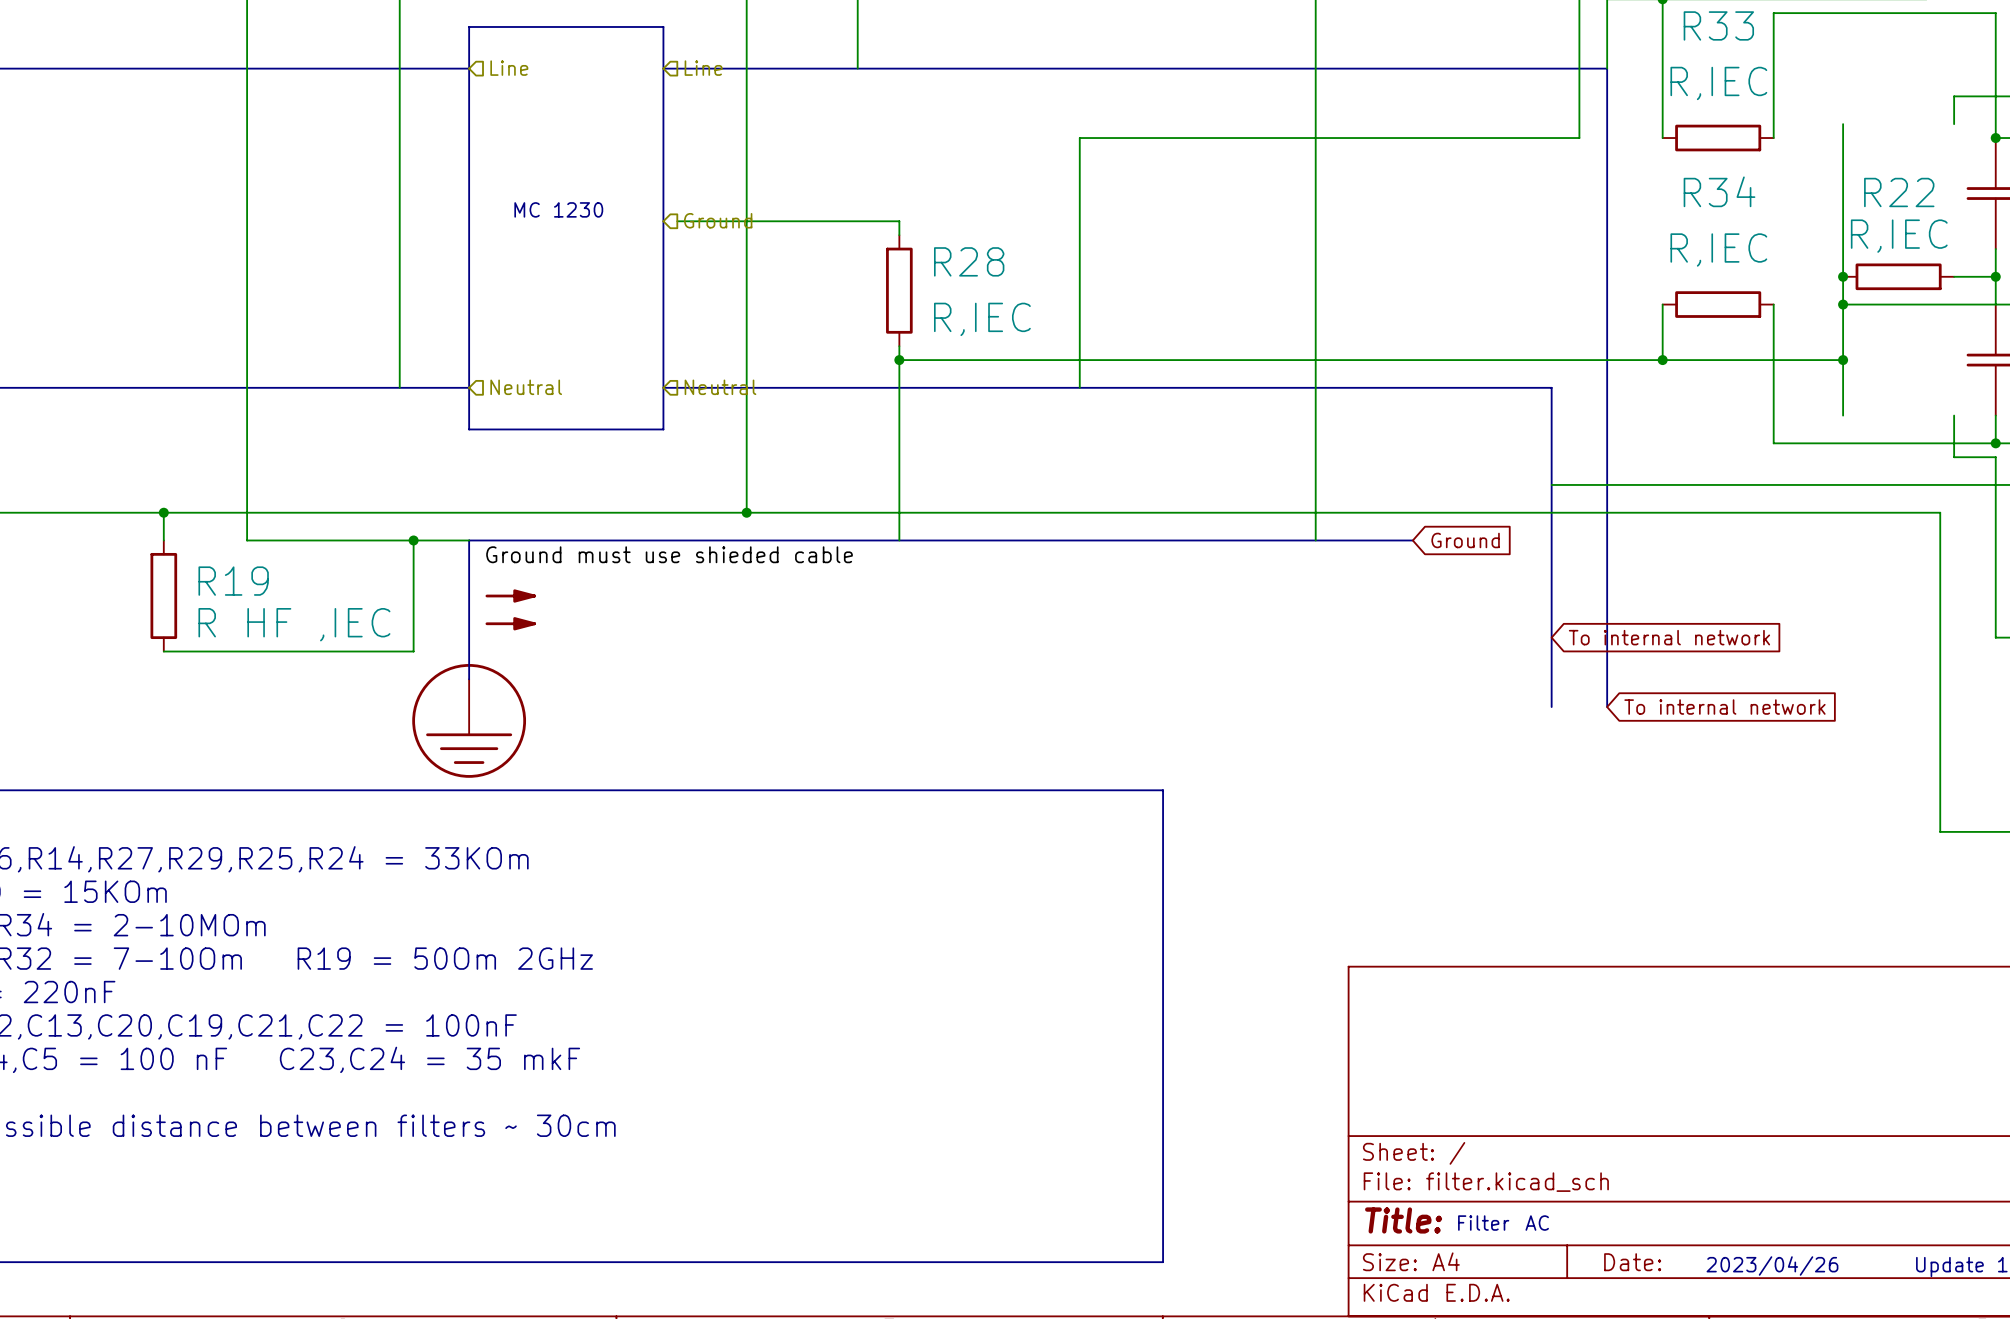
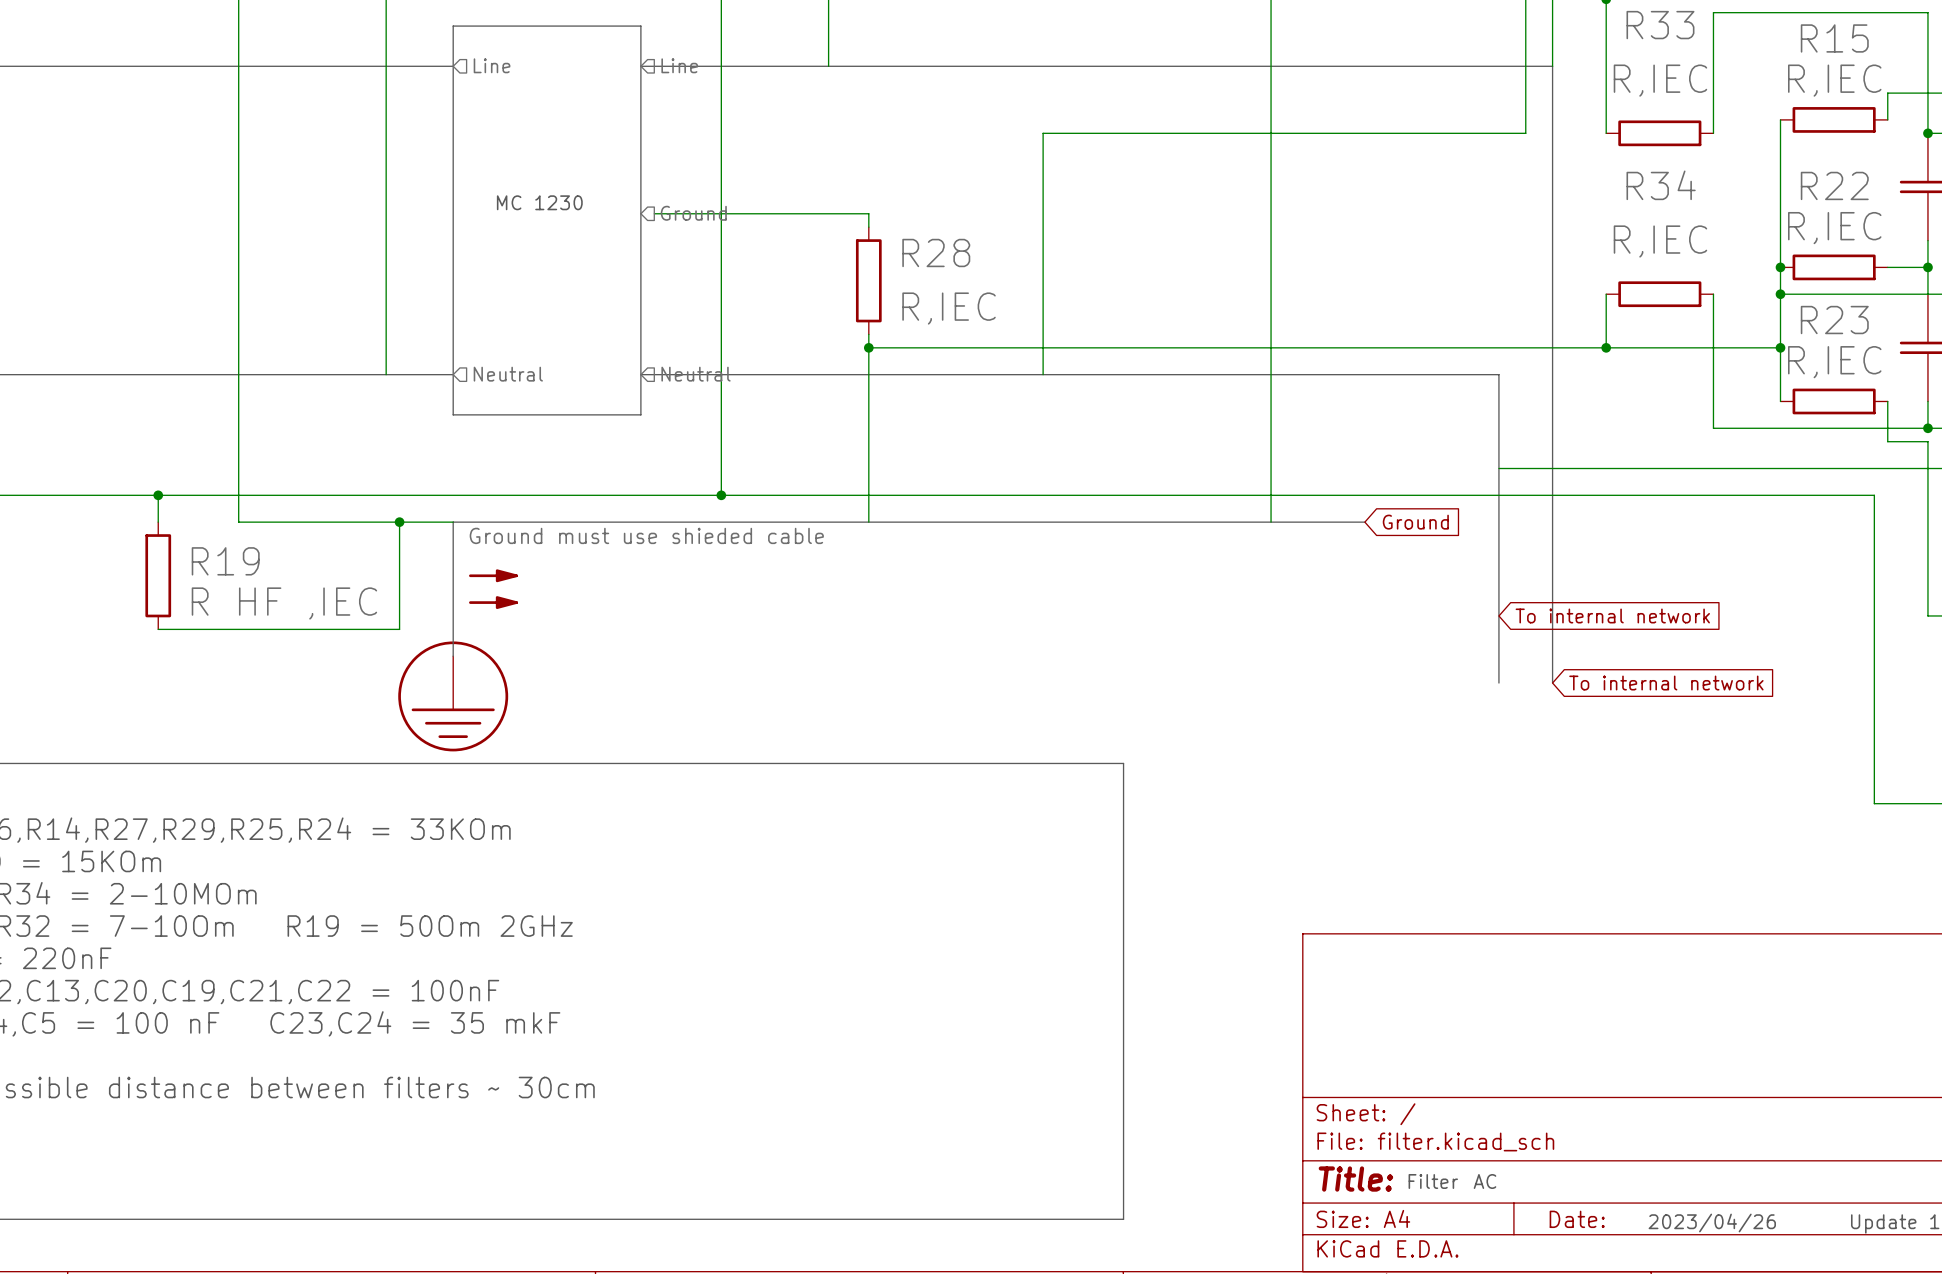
R15: none -> R,IEC (1834, 119)
R23: none -> R,IEC (1834, 401)

